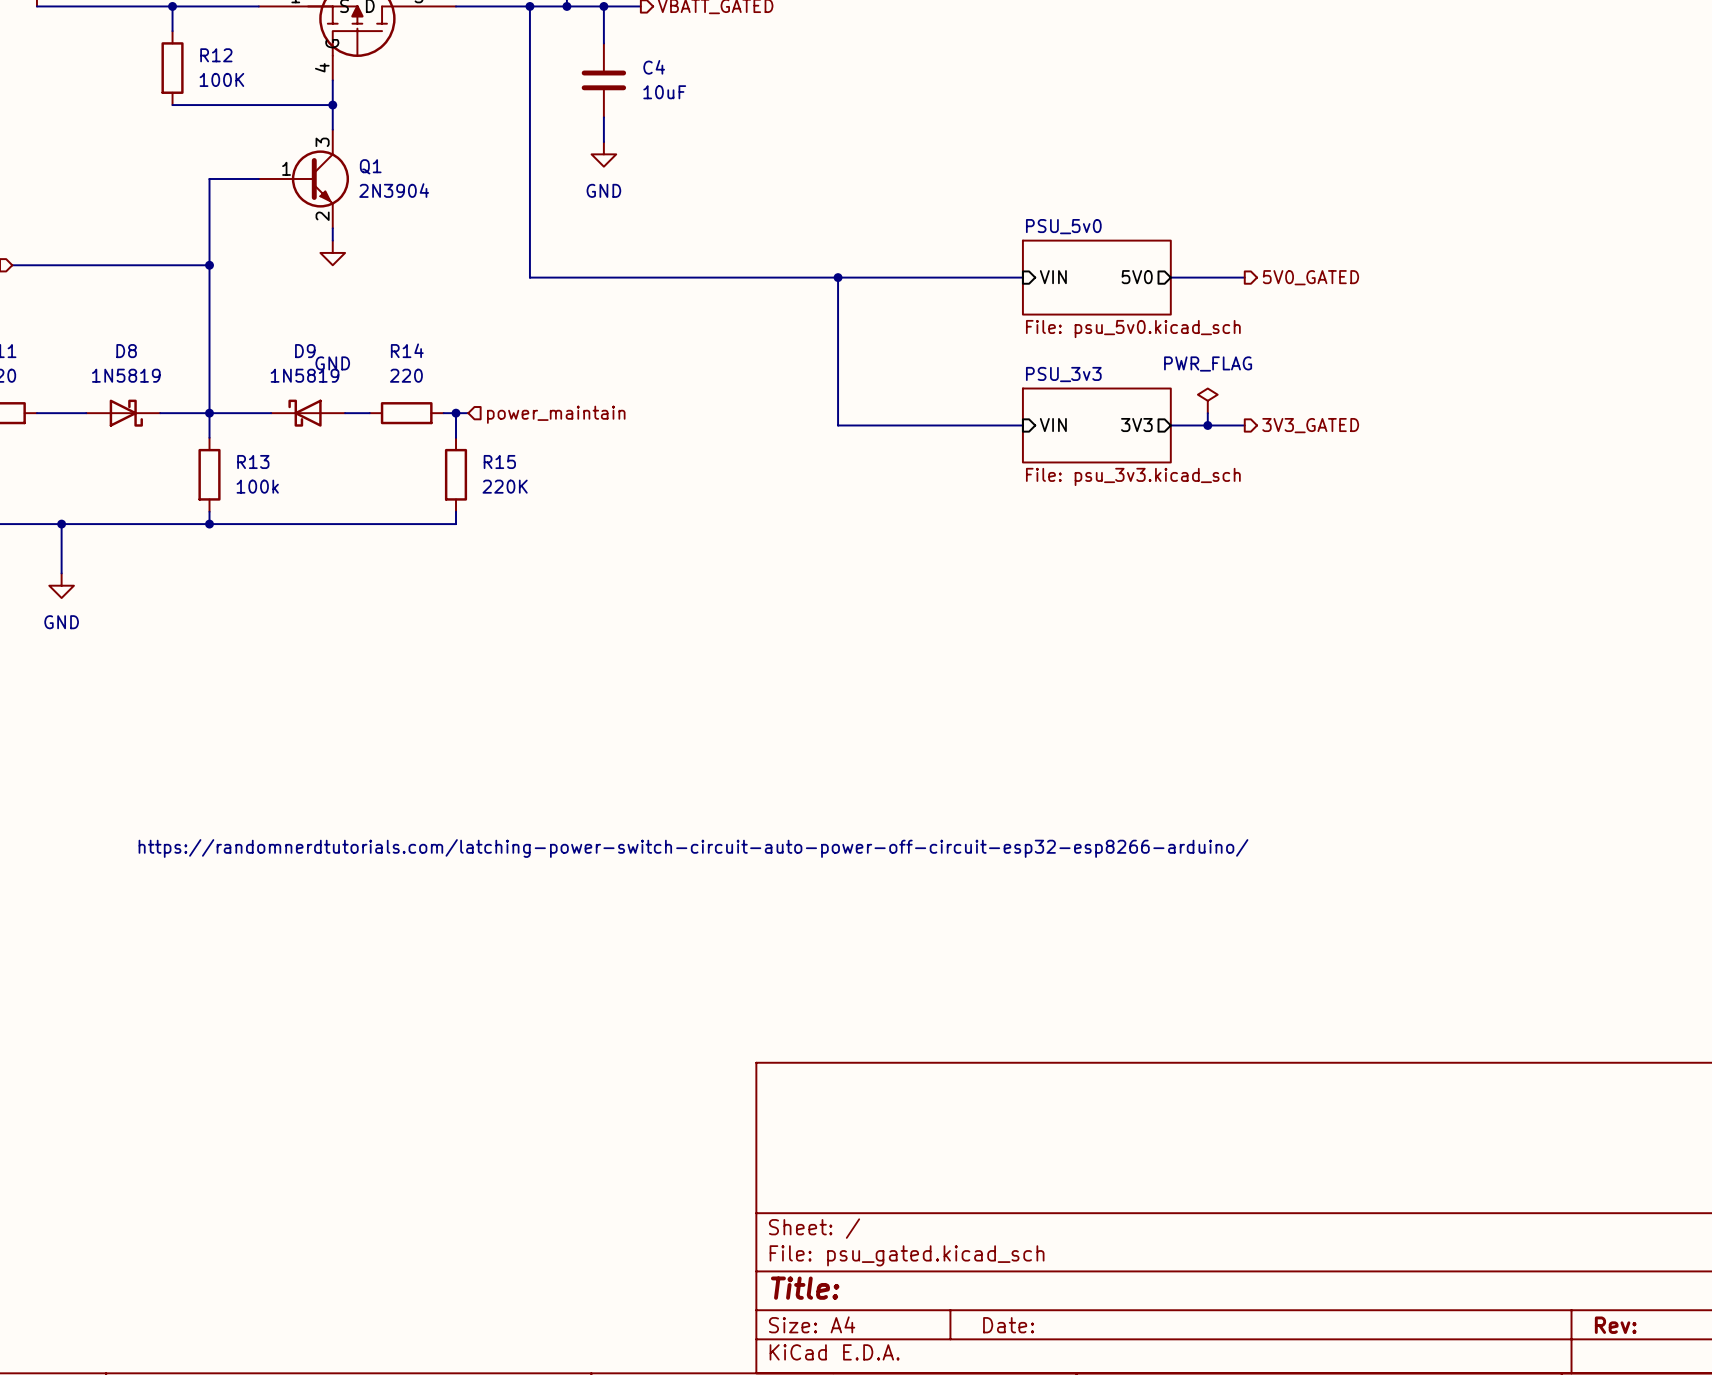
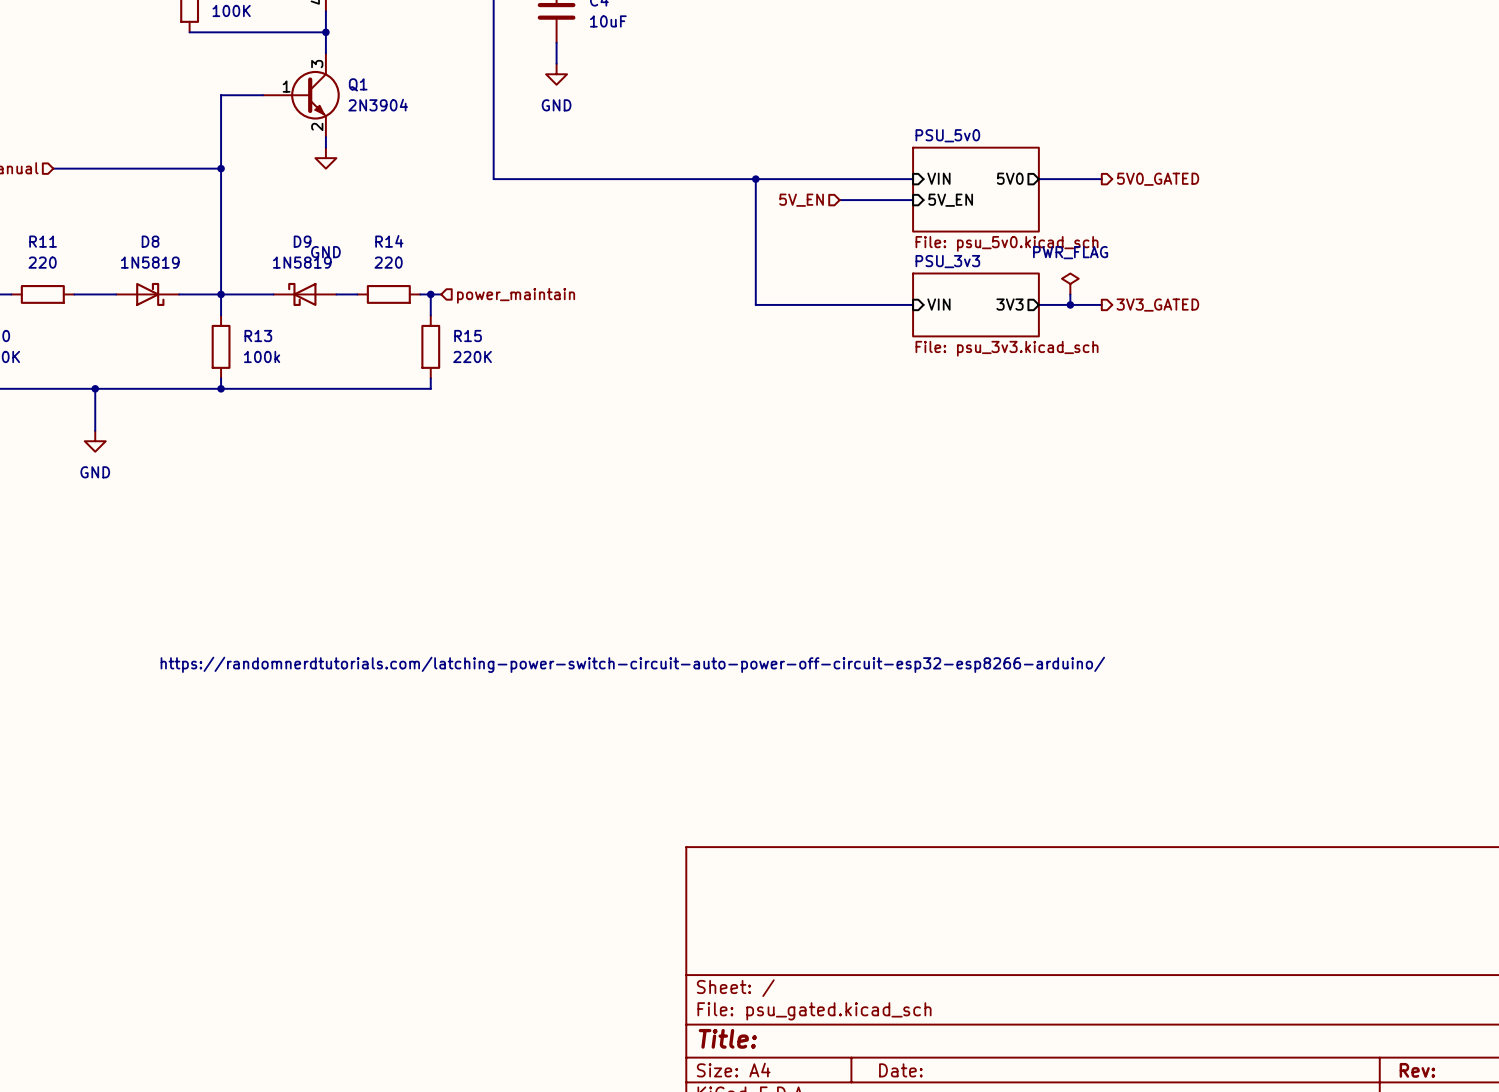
sheet PSU_5v0 shape: [1022, 239, 1172, 316] -> [912, 147, 1040, 233]
hierarchical label: none -> 5V_EN (801, 200)
wire: none -> (839, 200) (913, 200)
sheet pin: none -> 5V_EN (950, 200)

